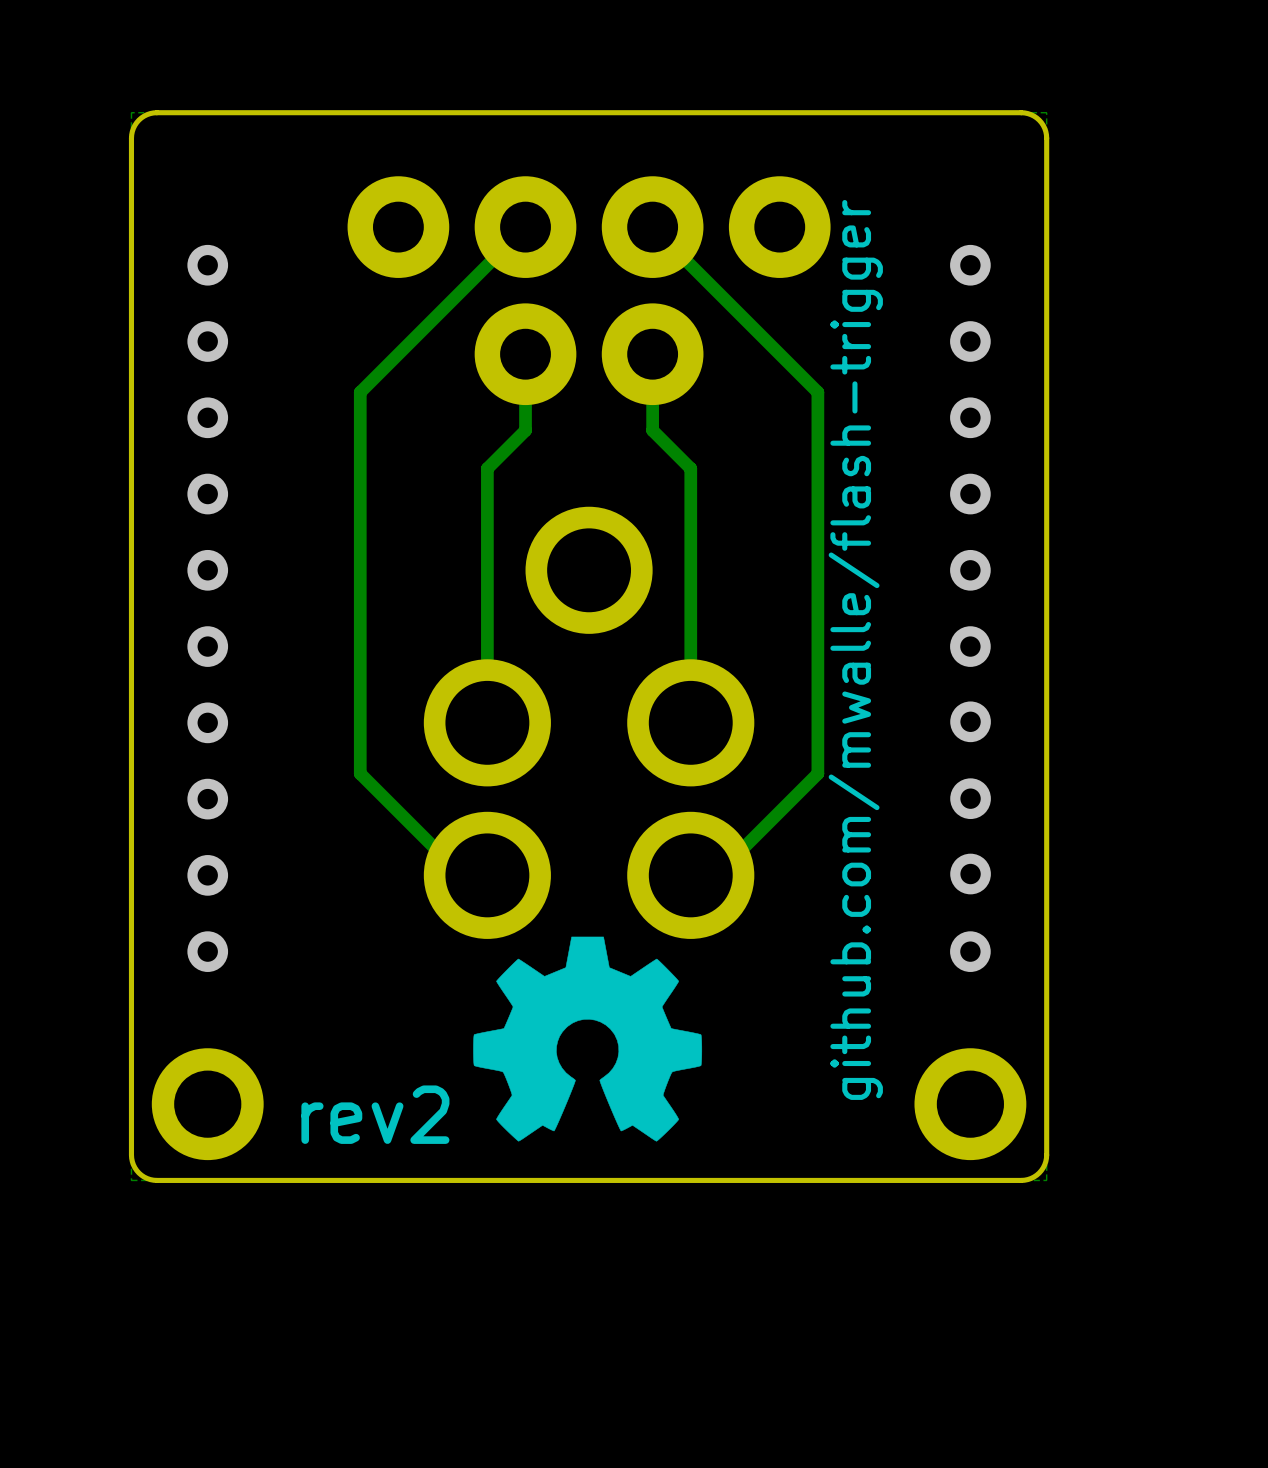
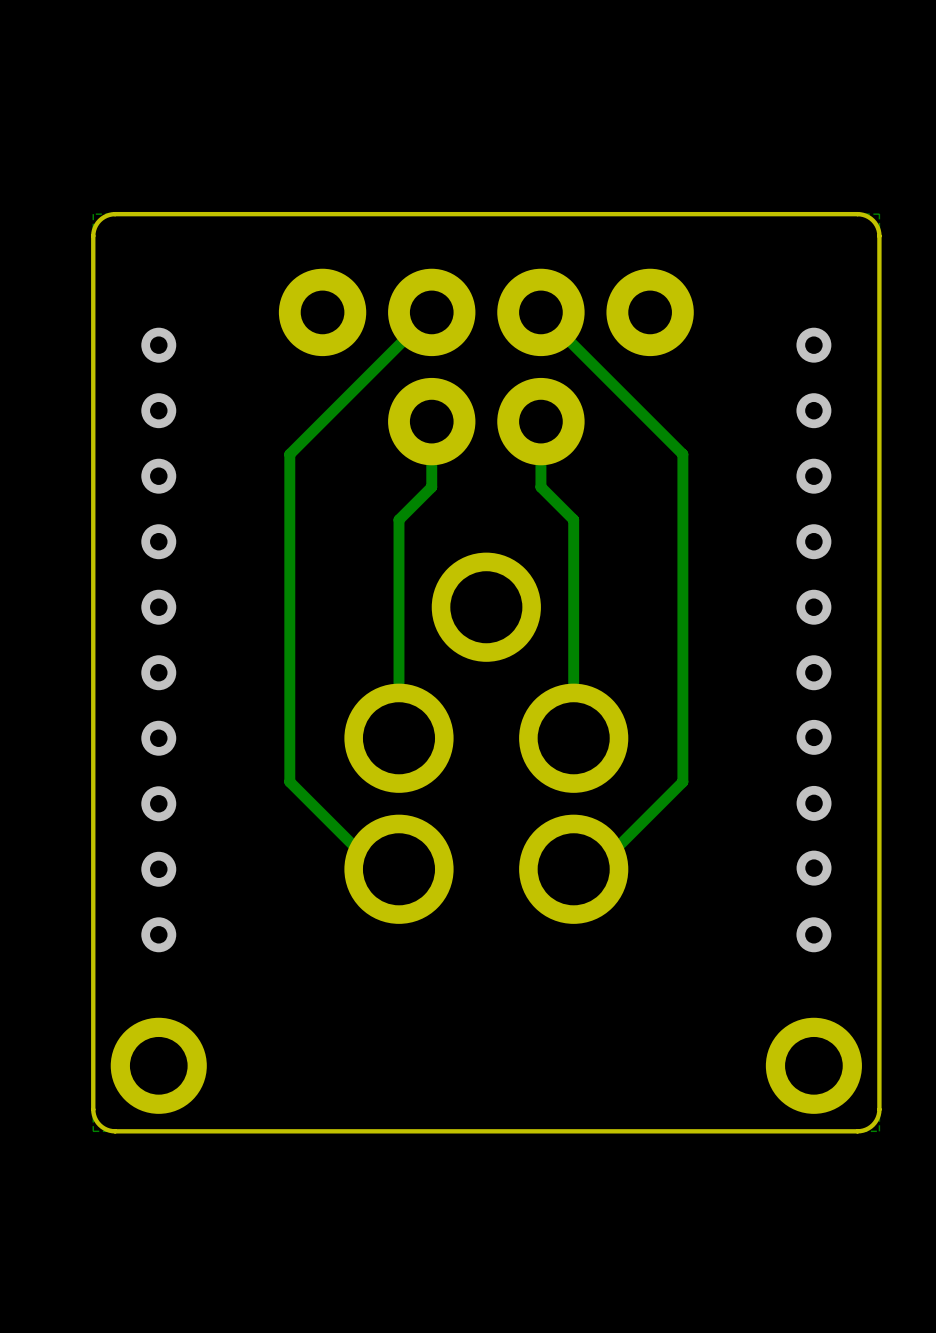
text: github.com/mwalle/flash-trigger (855, 649) -> none
drawing: [473, 936, 703, 1142] -> none
text: rev2 (375, 1114) -> none

